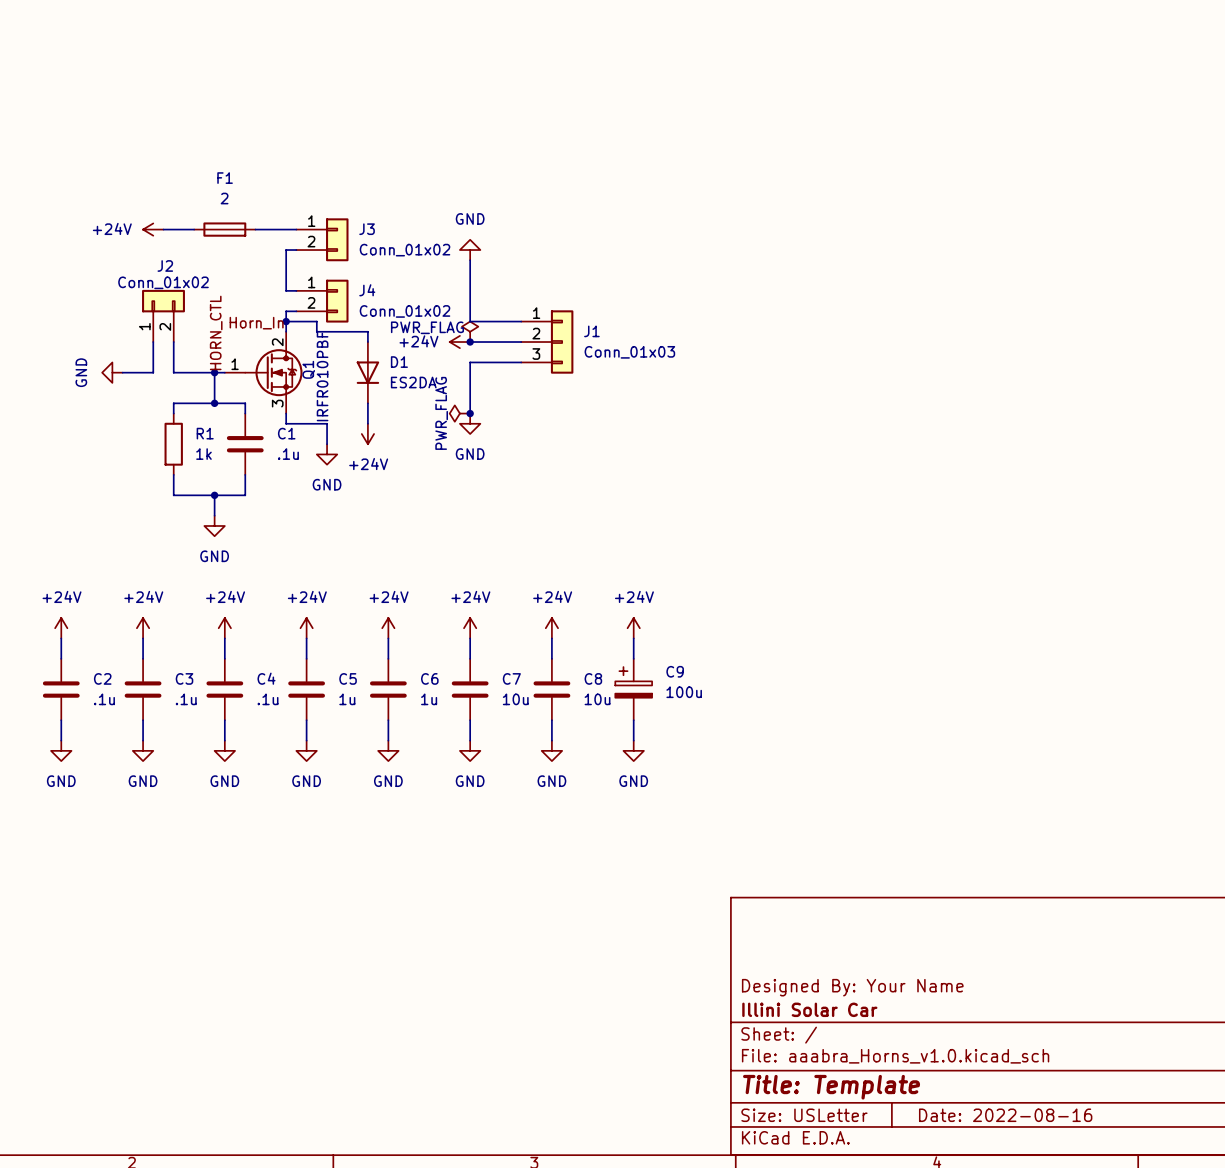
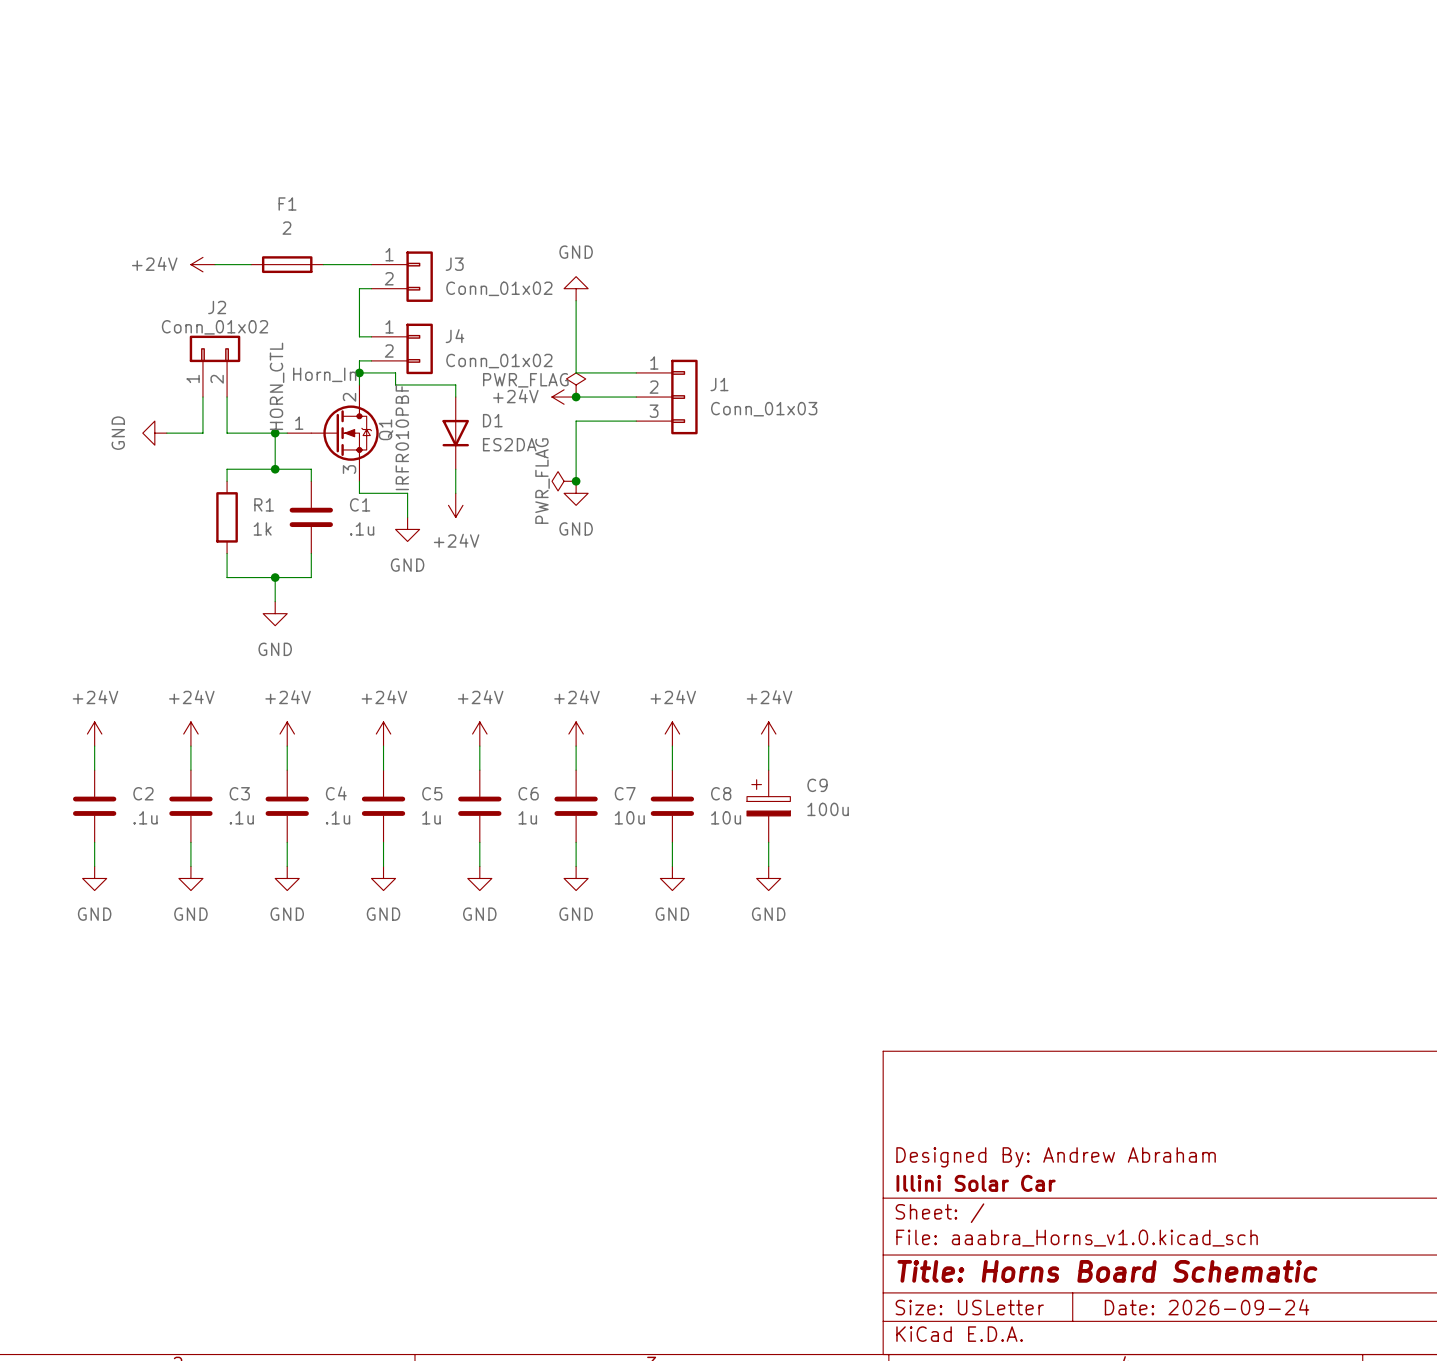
title block: Designed By: Your Name (852, 987) -> Designed By: Andrew Abraham (1056, 1157)
title block: Title: Template (831, 1087) -> Title: Horns Board Schematic (1107, 1271)
title block: Date: 2022-08-16 (1005, 1115) -> Date: 2026-09-24 (1207, 1307)

